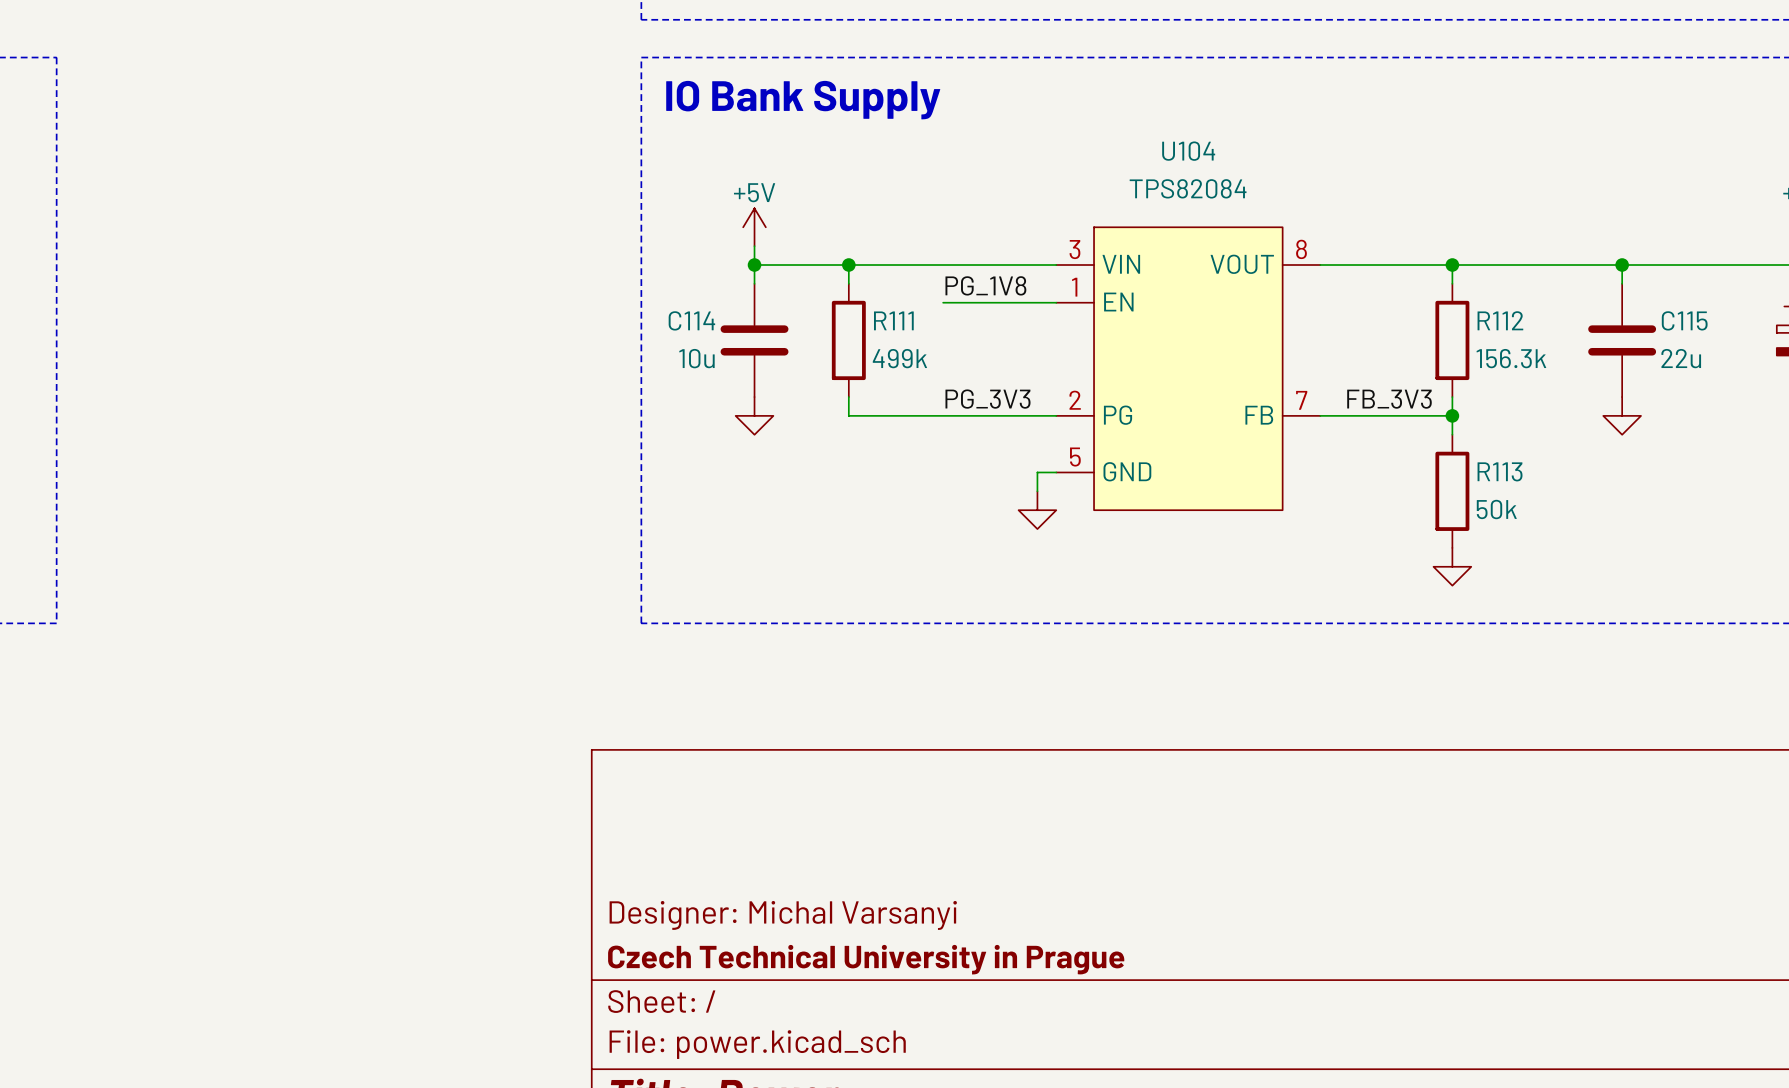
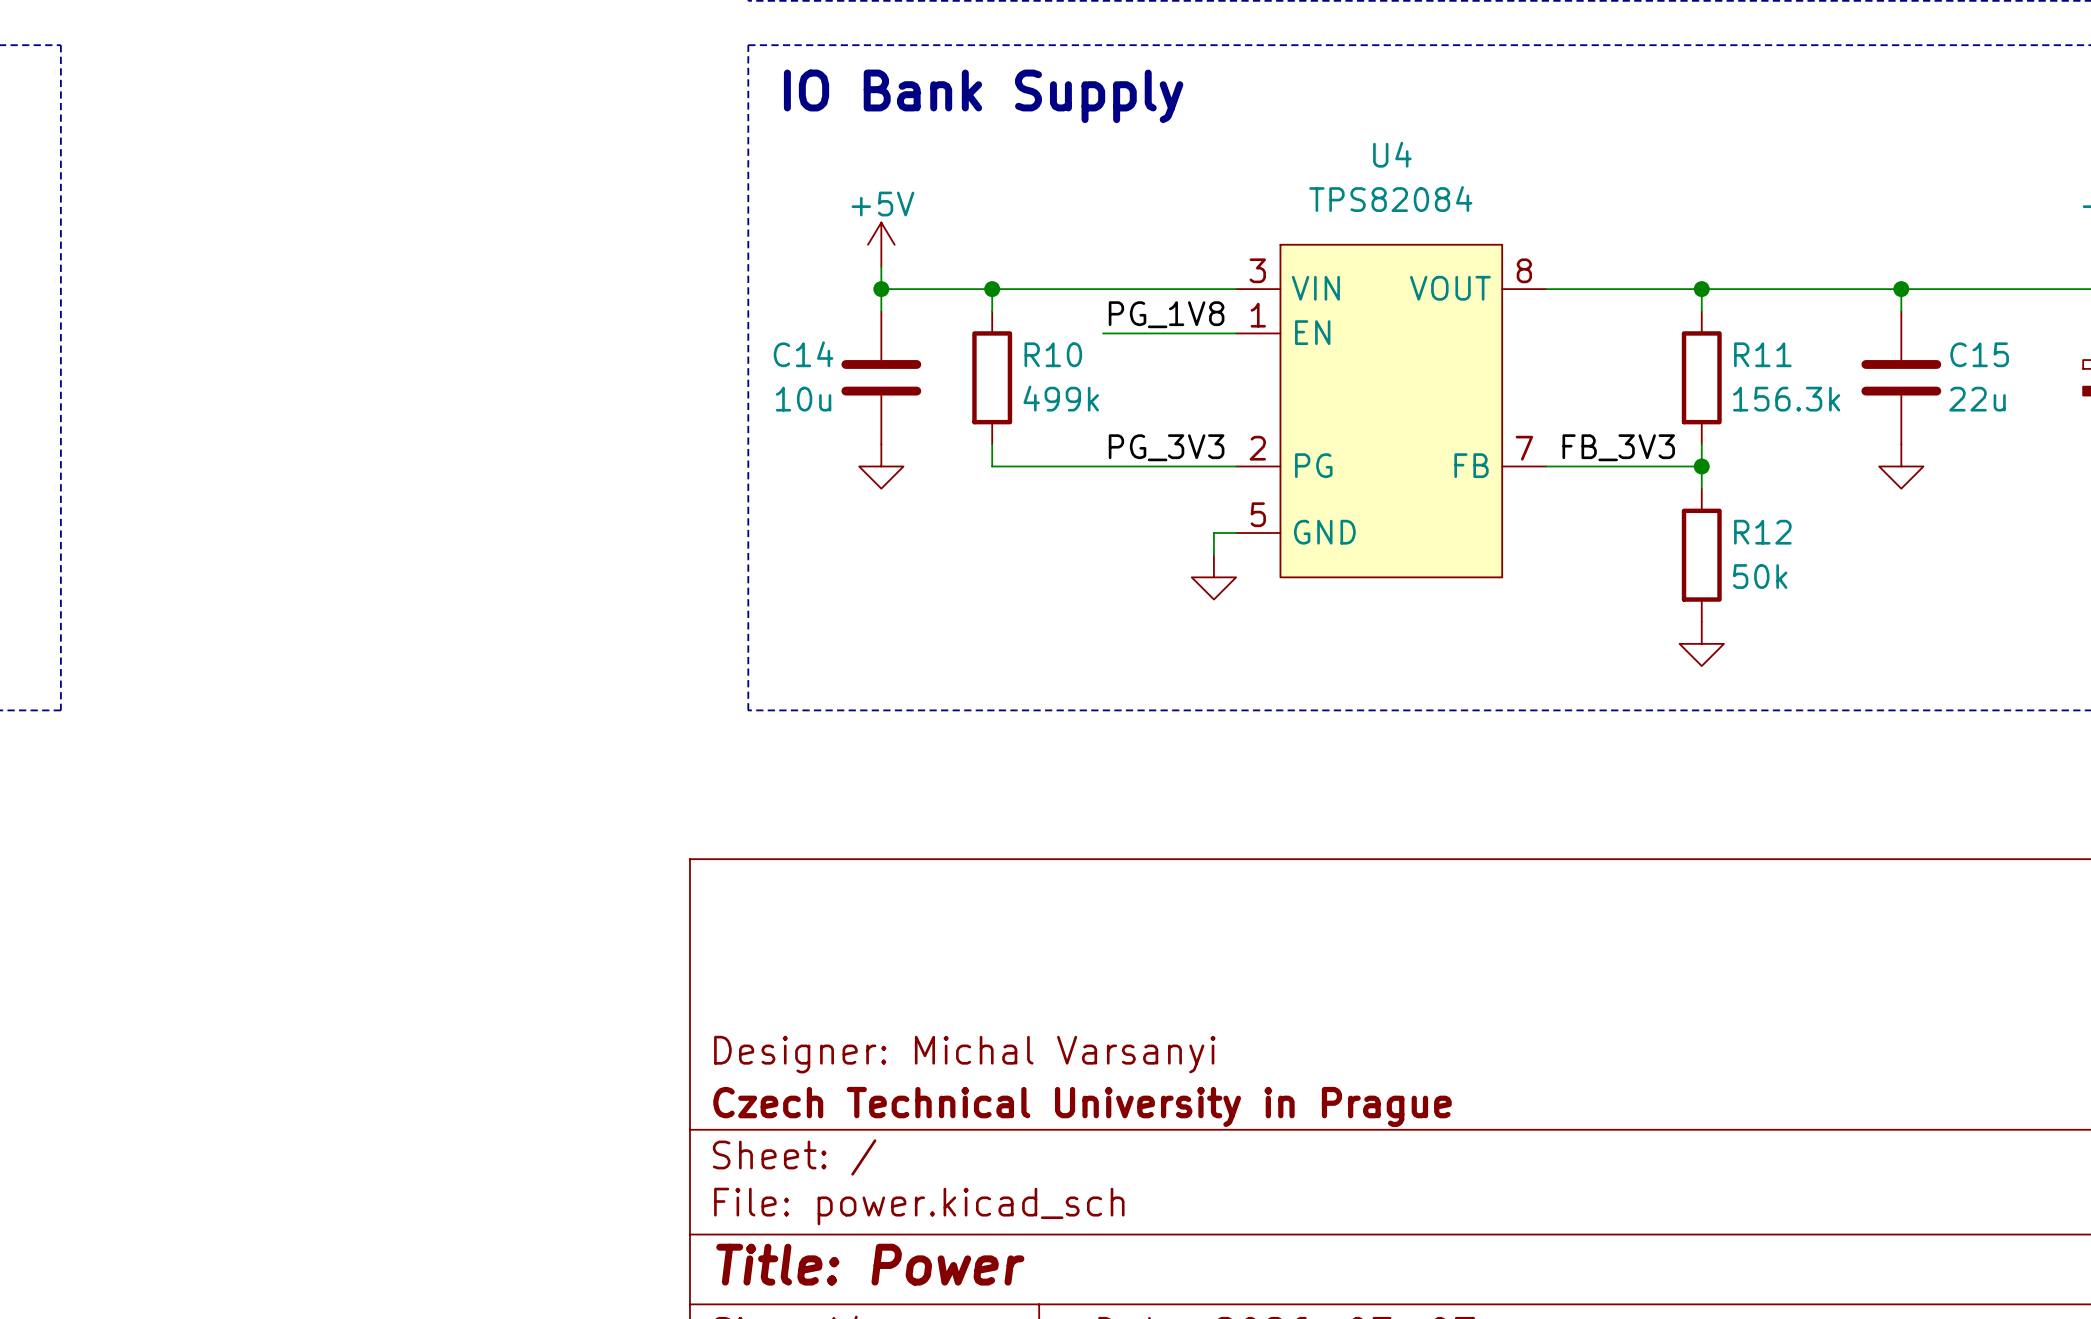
U104 name: U104 (1188, 151) -> U4 (1392, 154)
C114 name: C114 (691, 320) -> C14 (803, 354)
R111 name: R111 (893, 320) -> R10 (1053, 354)
R112 name: R112 (1500, 320) -> R11 (1762, 354)
C115 name: C115 (1684, 320) -> C15 (1979, 354)
R113 name: R113 (1500, 471) -> R12 (1762, 532)

